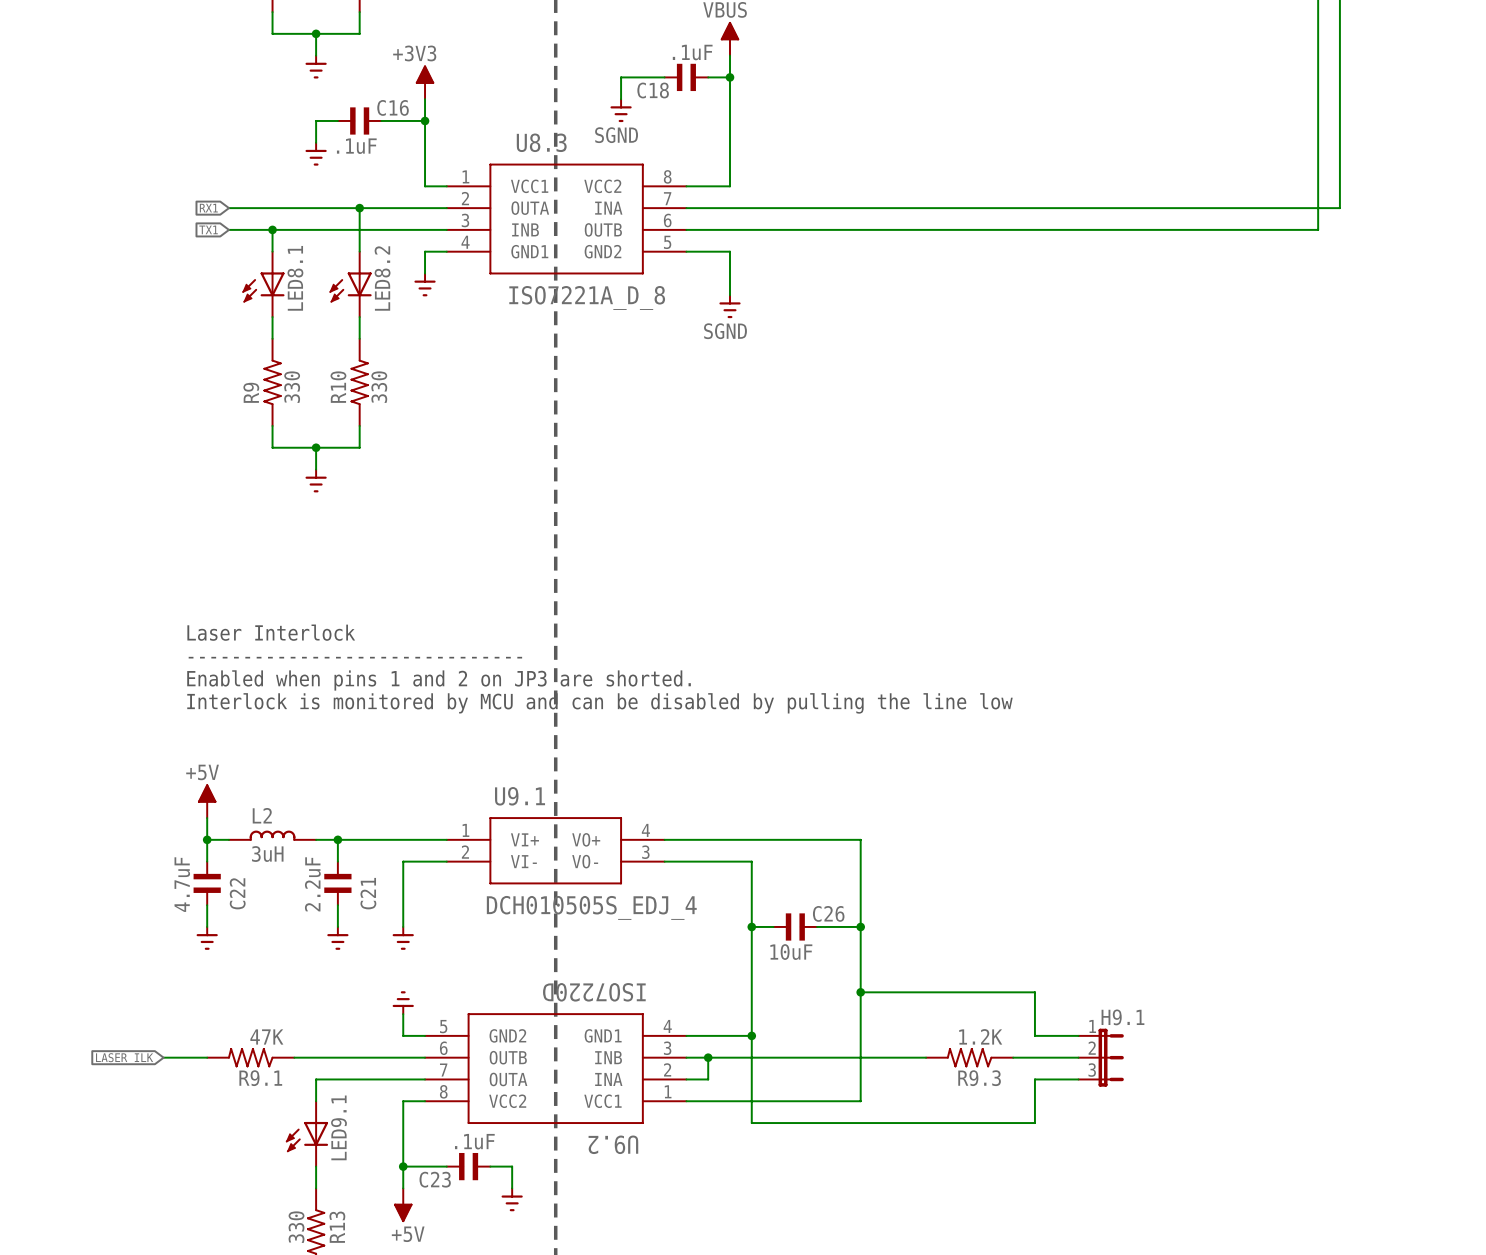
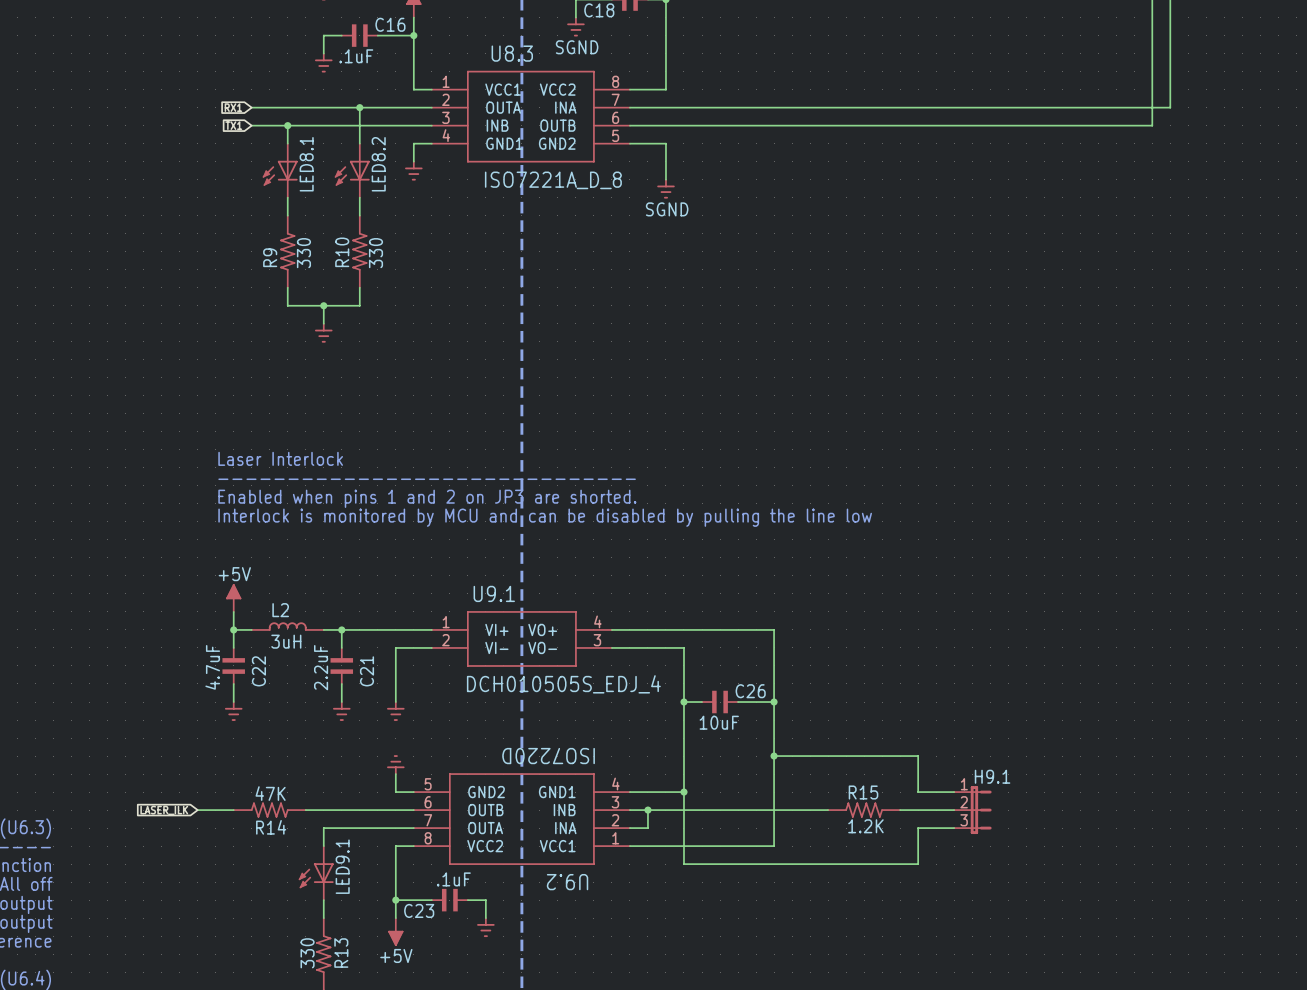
R9.1: 47K (250, 1057) -> none
R14: none -> 47K (269, 810)
R9.3: 1.2K (969, 1057) -> none
R15: none -> 1.2K (864, 810)

